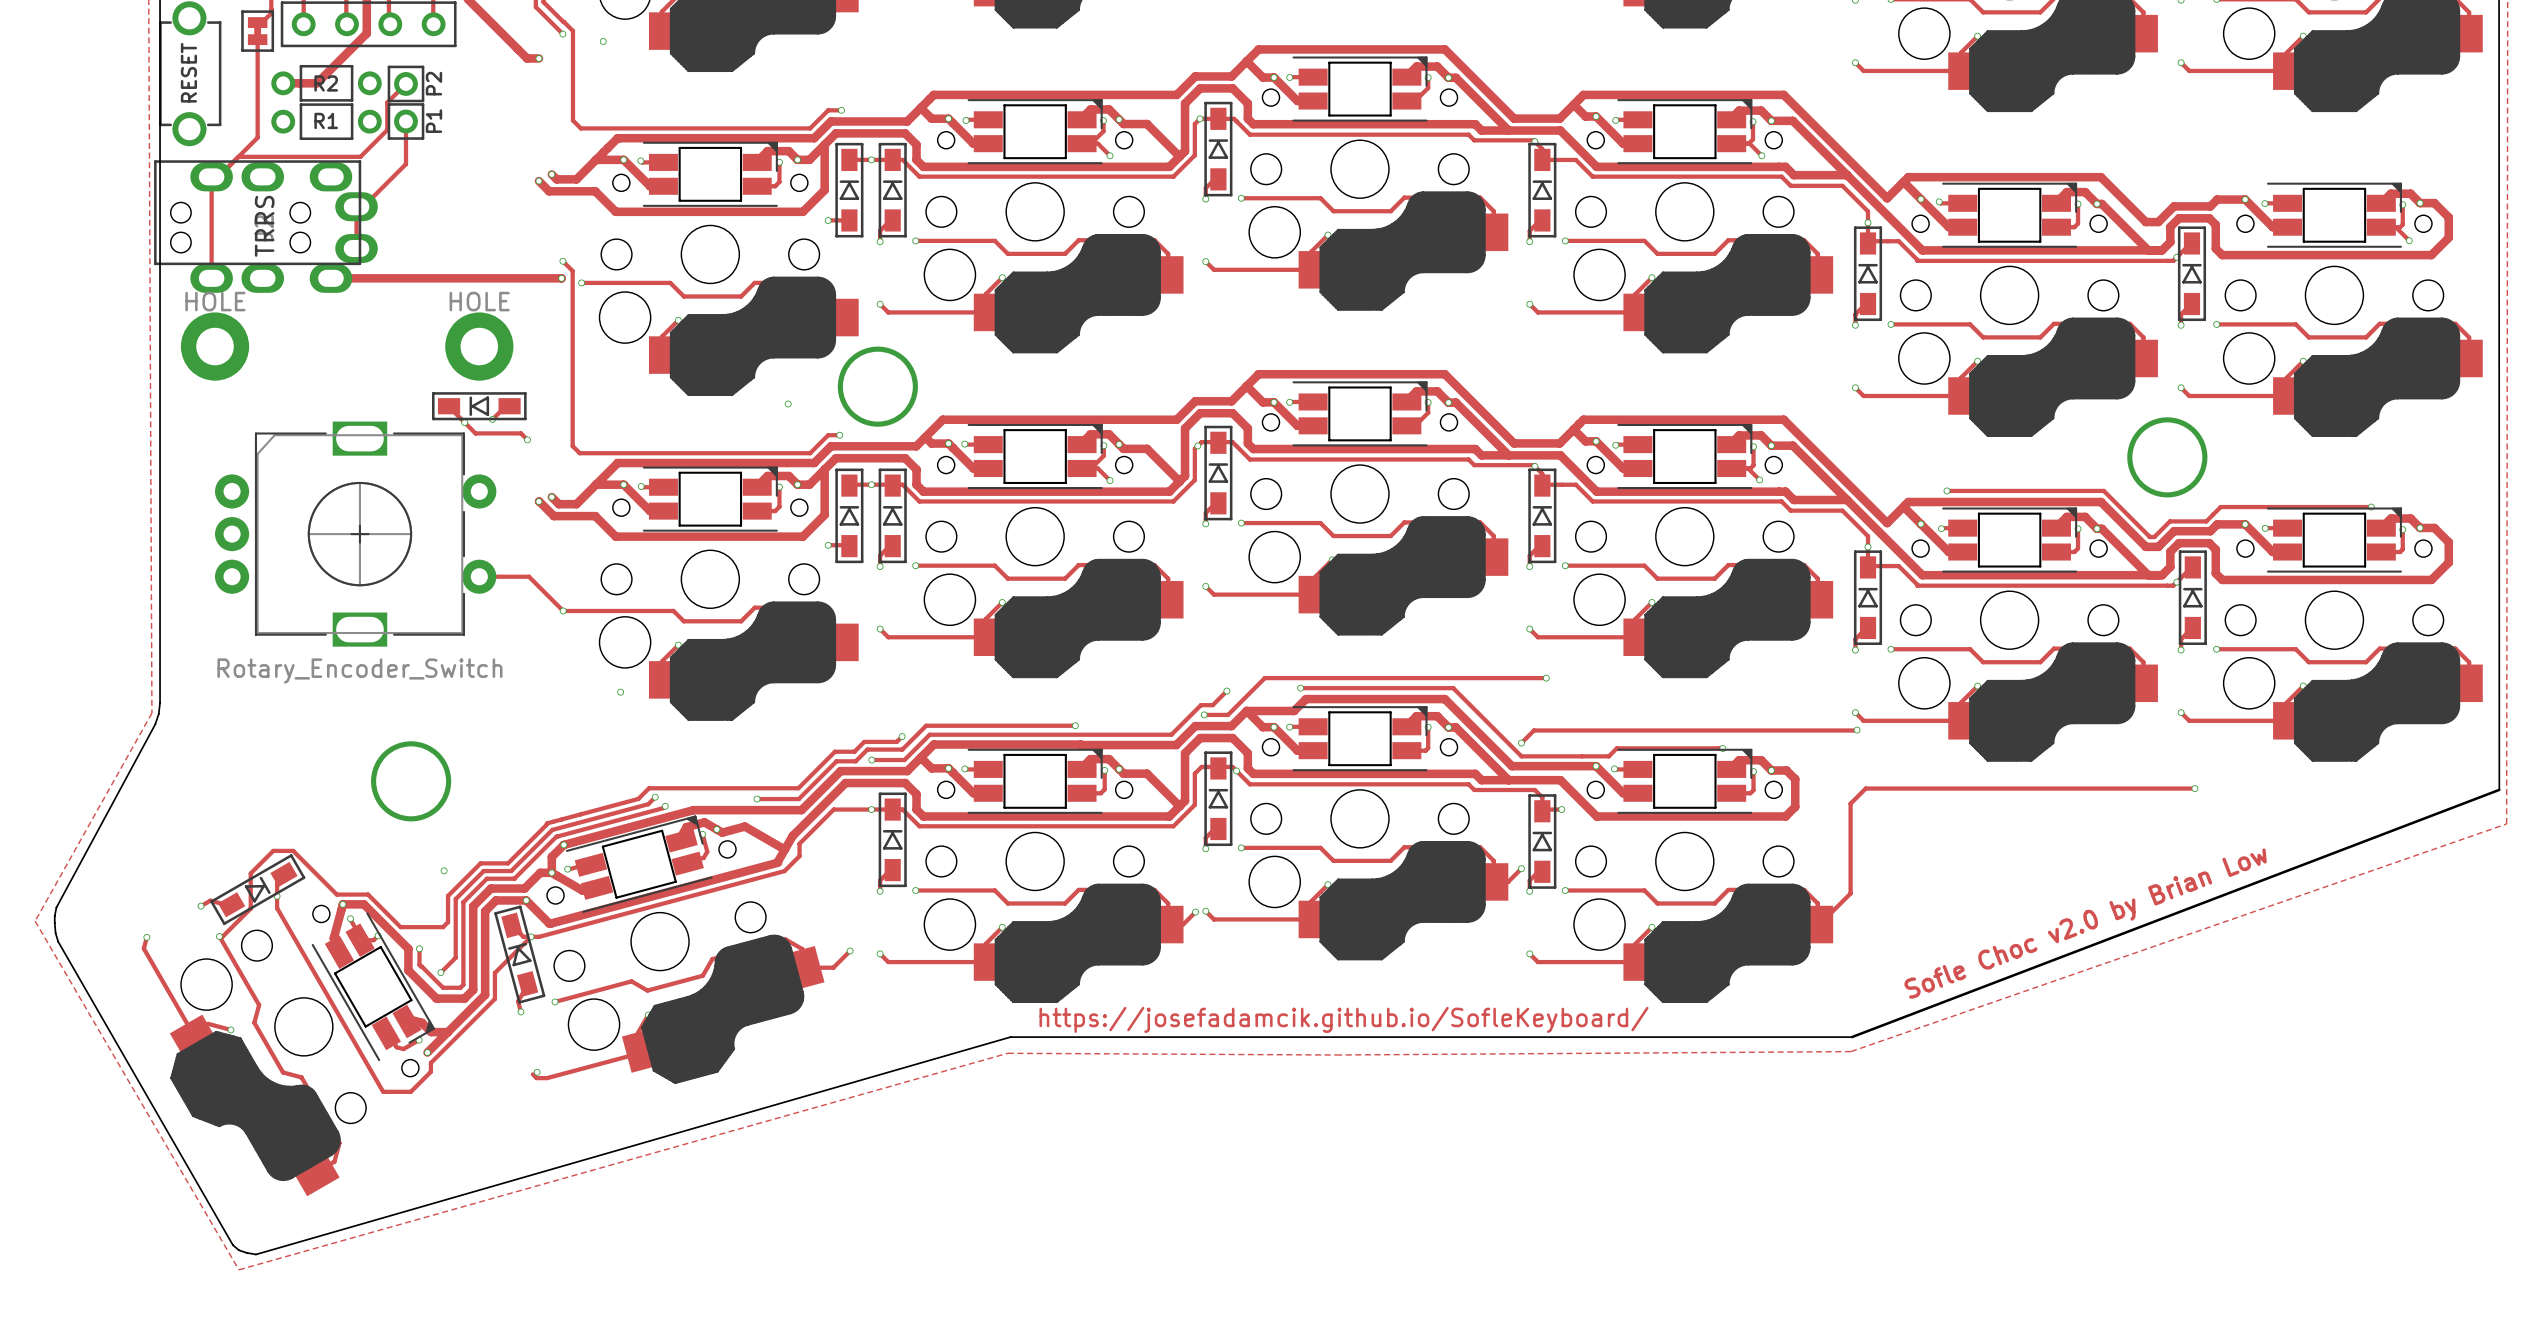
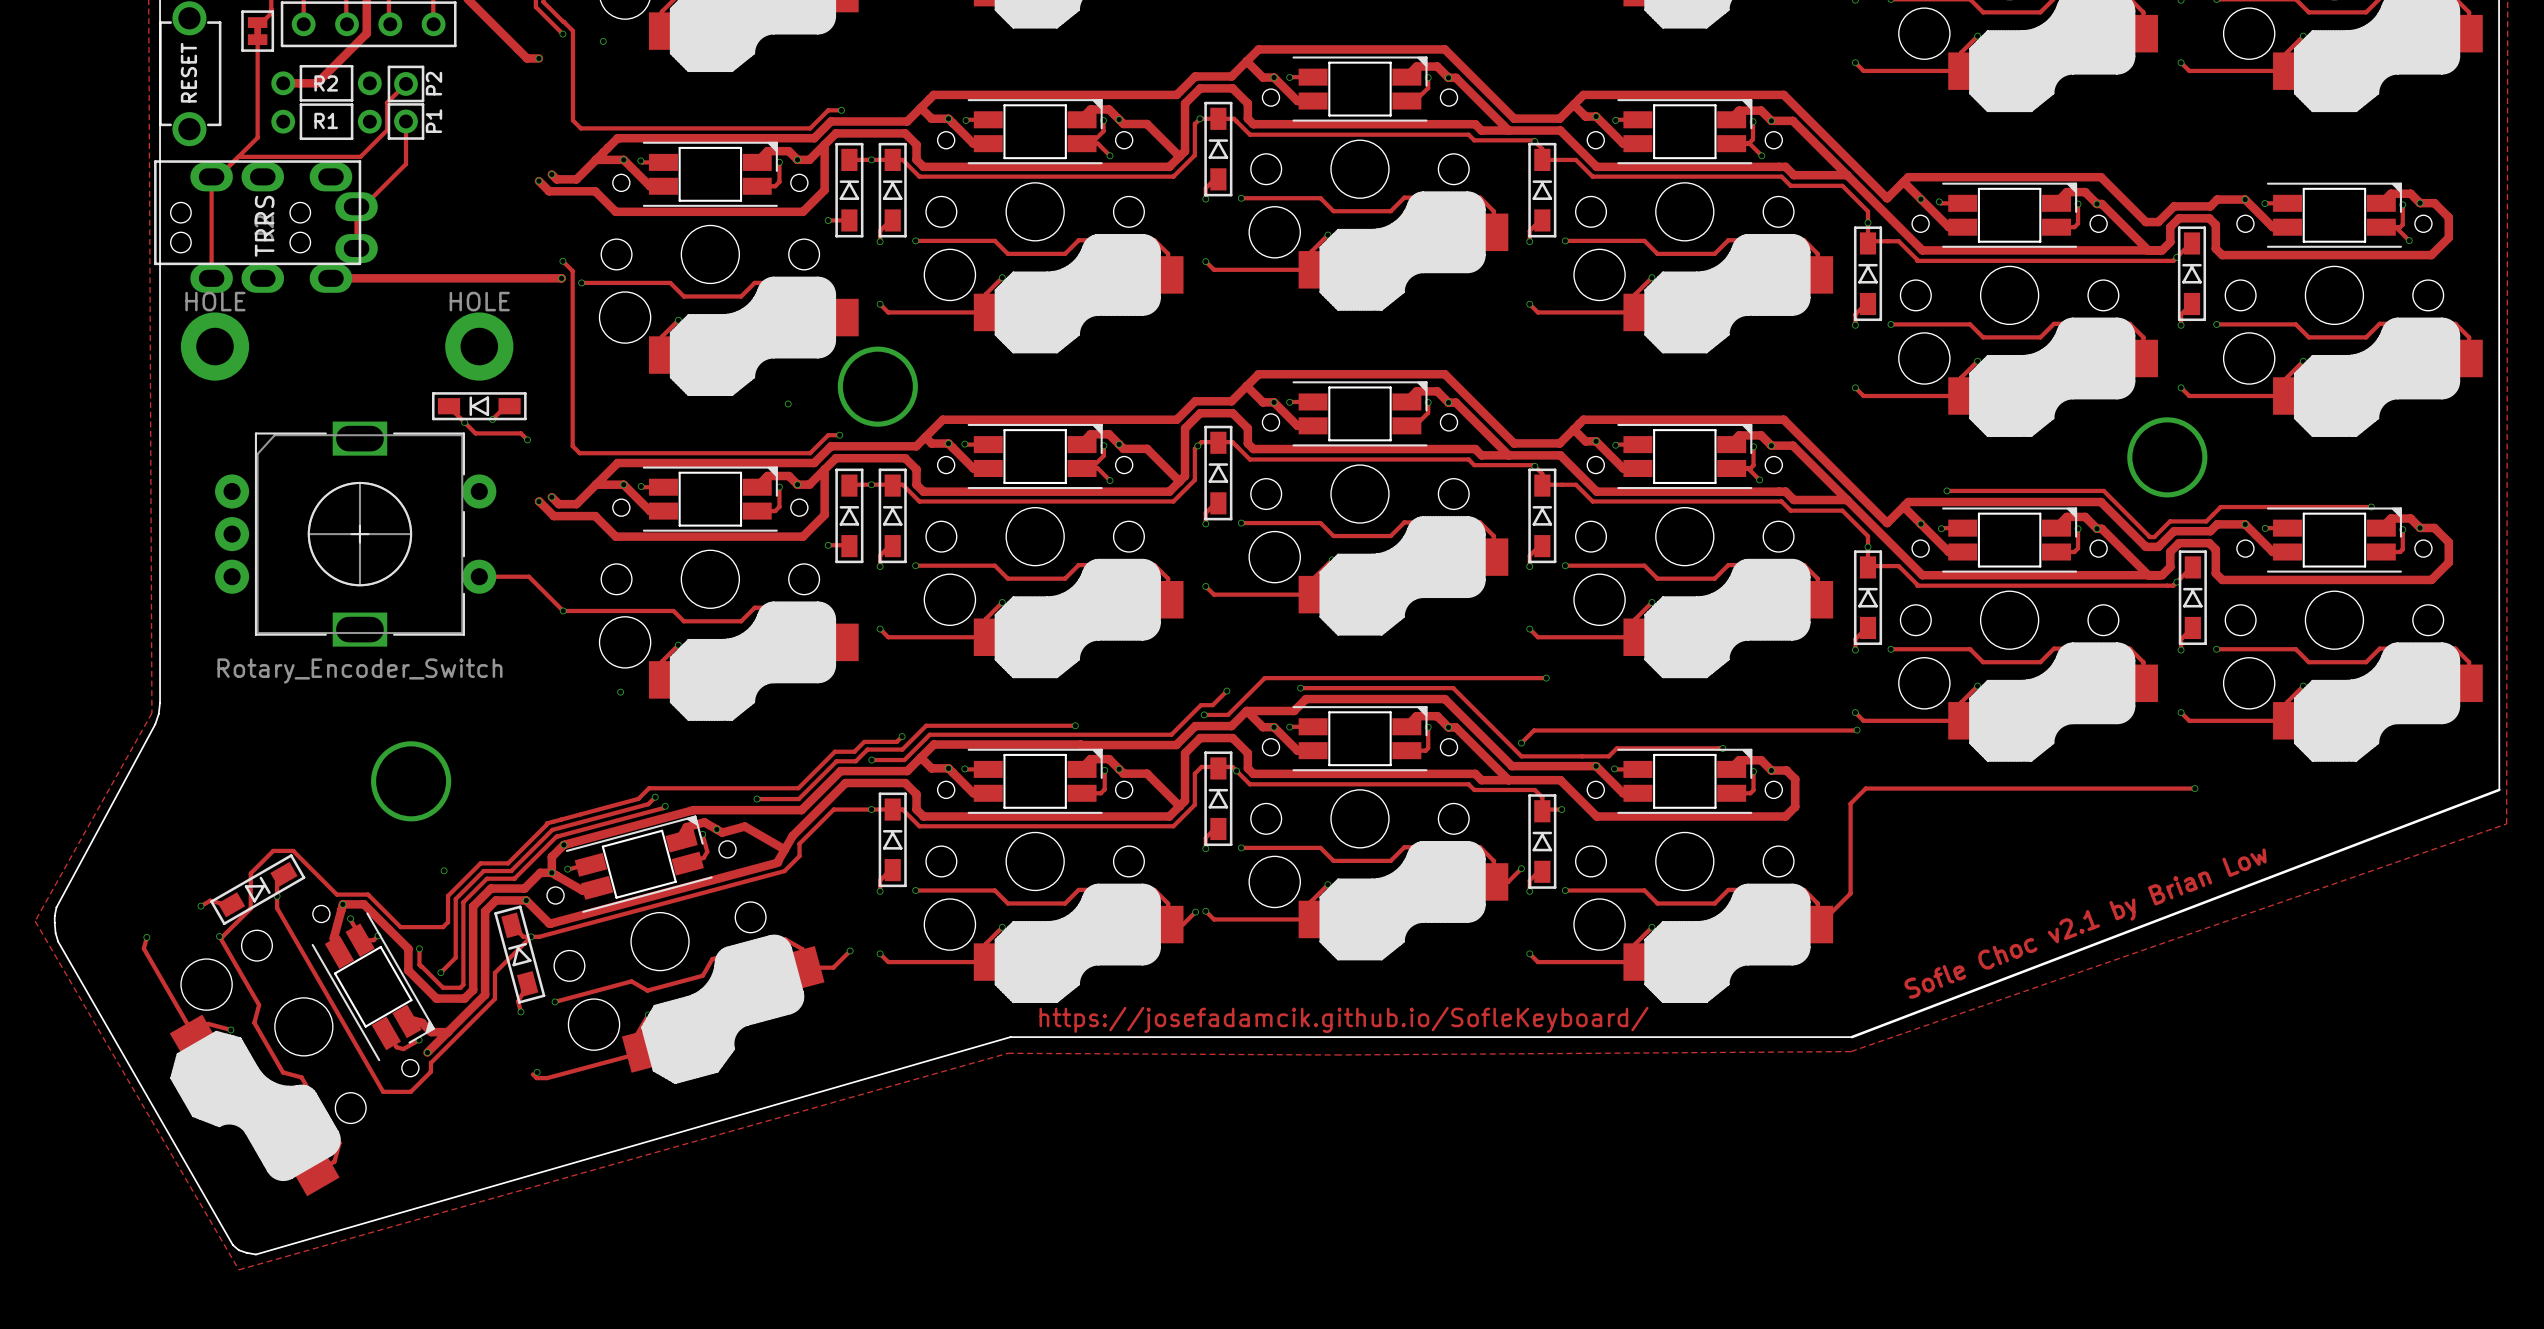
text: Sofle Choc v2.0 by Brian Low (2085, 923) -> Sofle Choc v2.1 by Brian Low (2085, 923)

